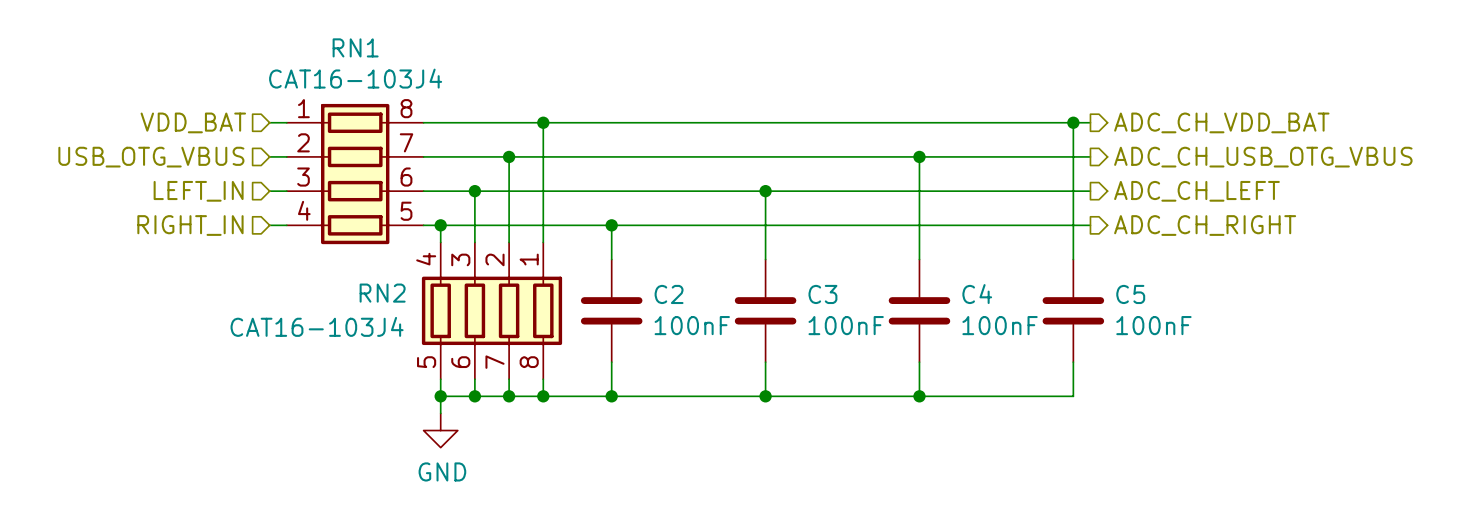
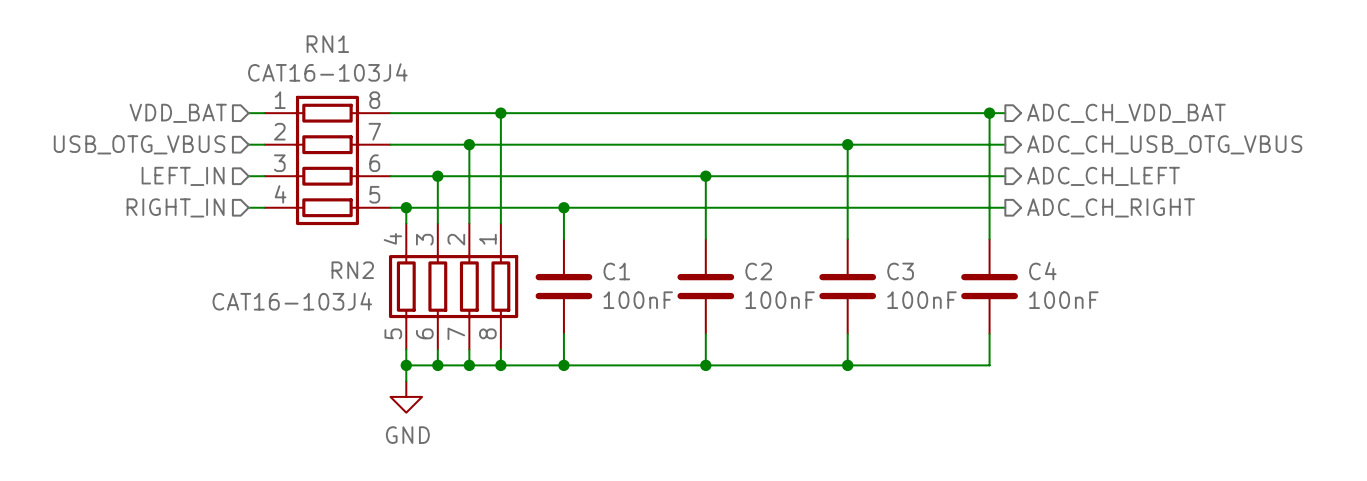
C2 name: C2 (669, 294) -> C1 (616, 271)
C3 name: C3 (822, 294) -> C2 (758, 271)
C4 name: C4 (977, 294) -> C3 (900, 271)
C5 name: C5 (1130, 294) -> C4 (1042, 271)

